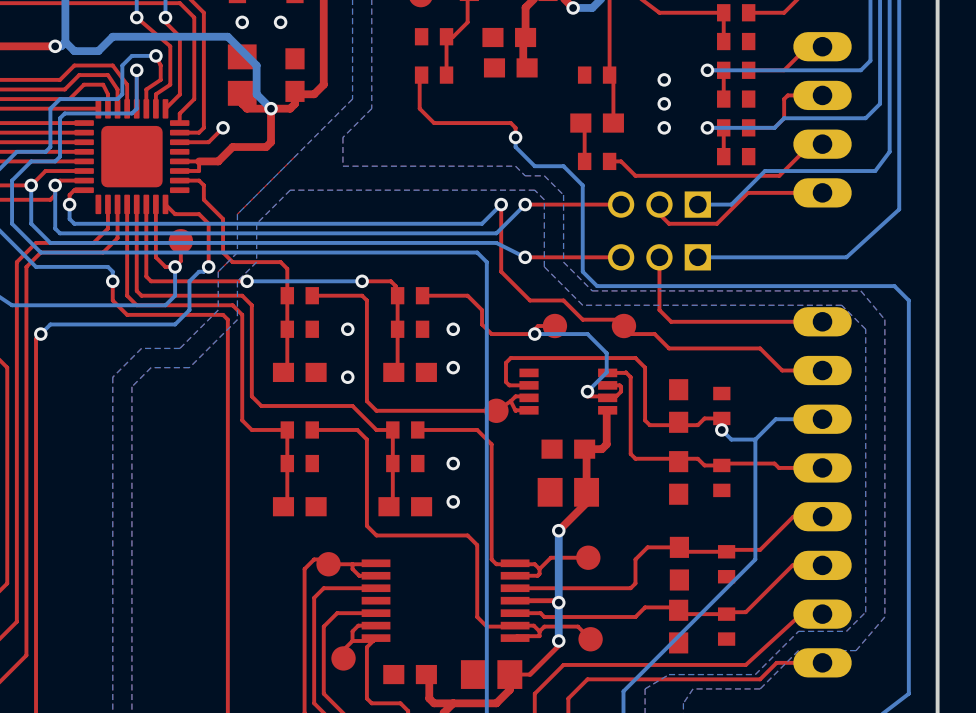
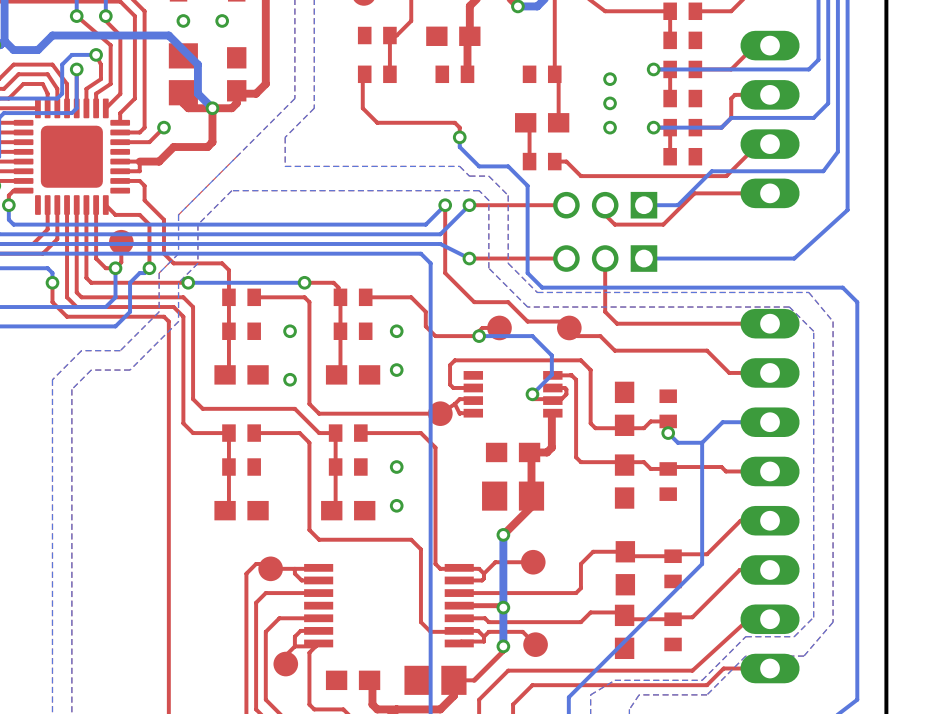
part footprint: [483, 58, 538, 78] -> [435, 65, 475, 84]

